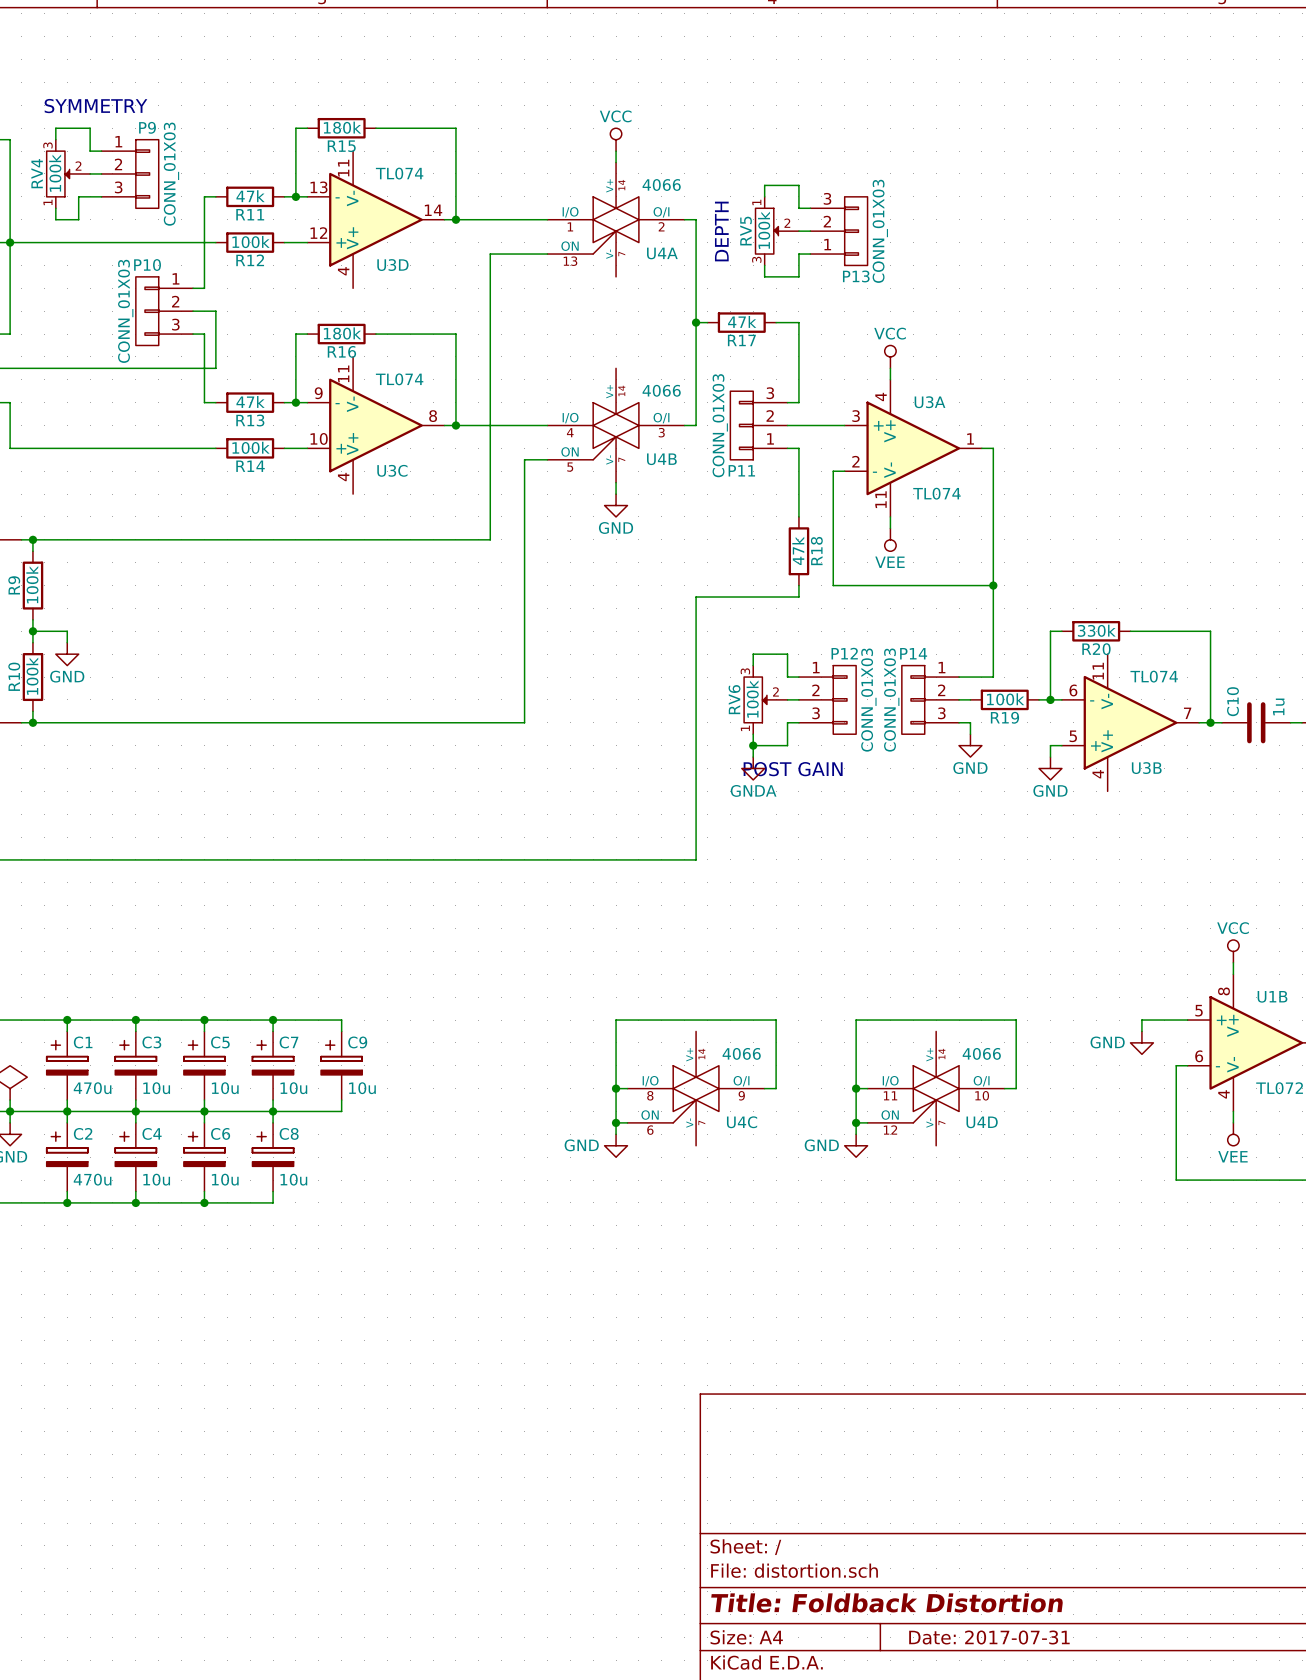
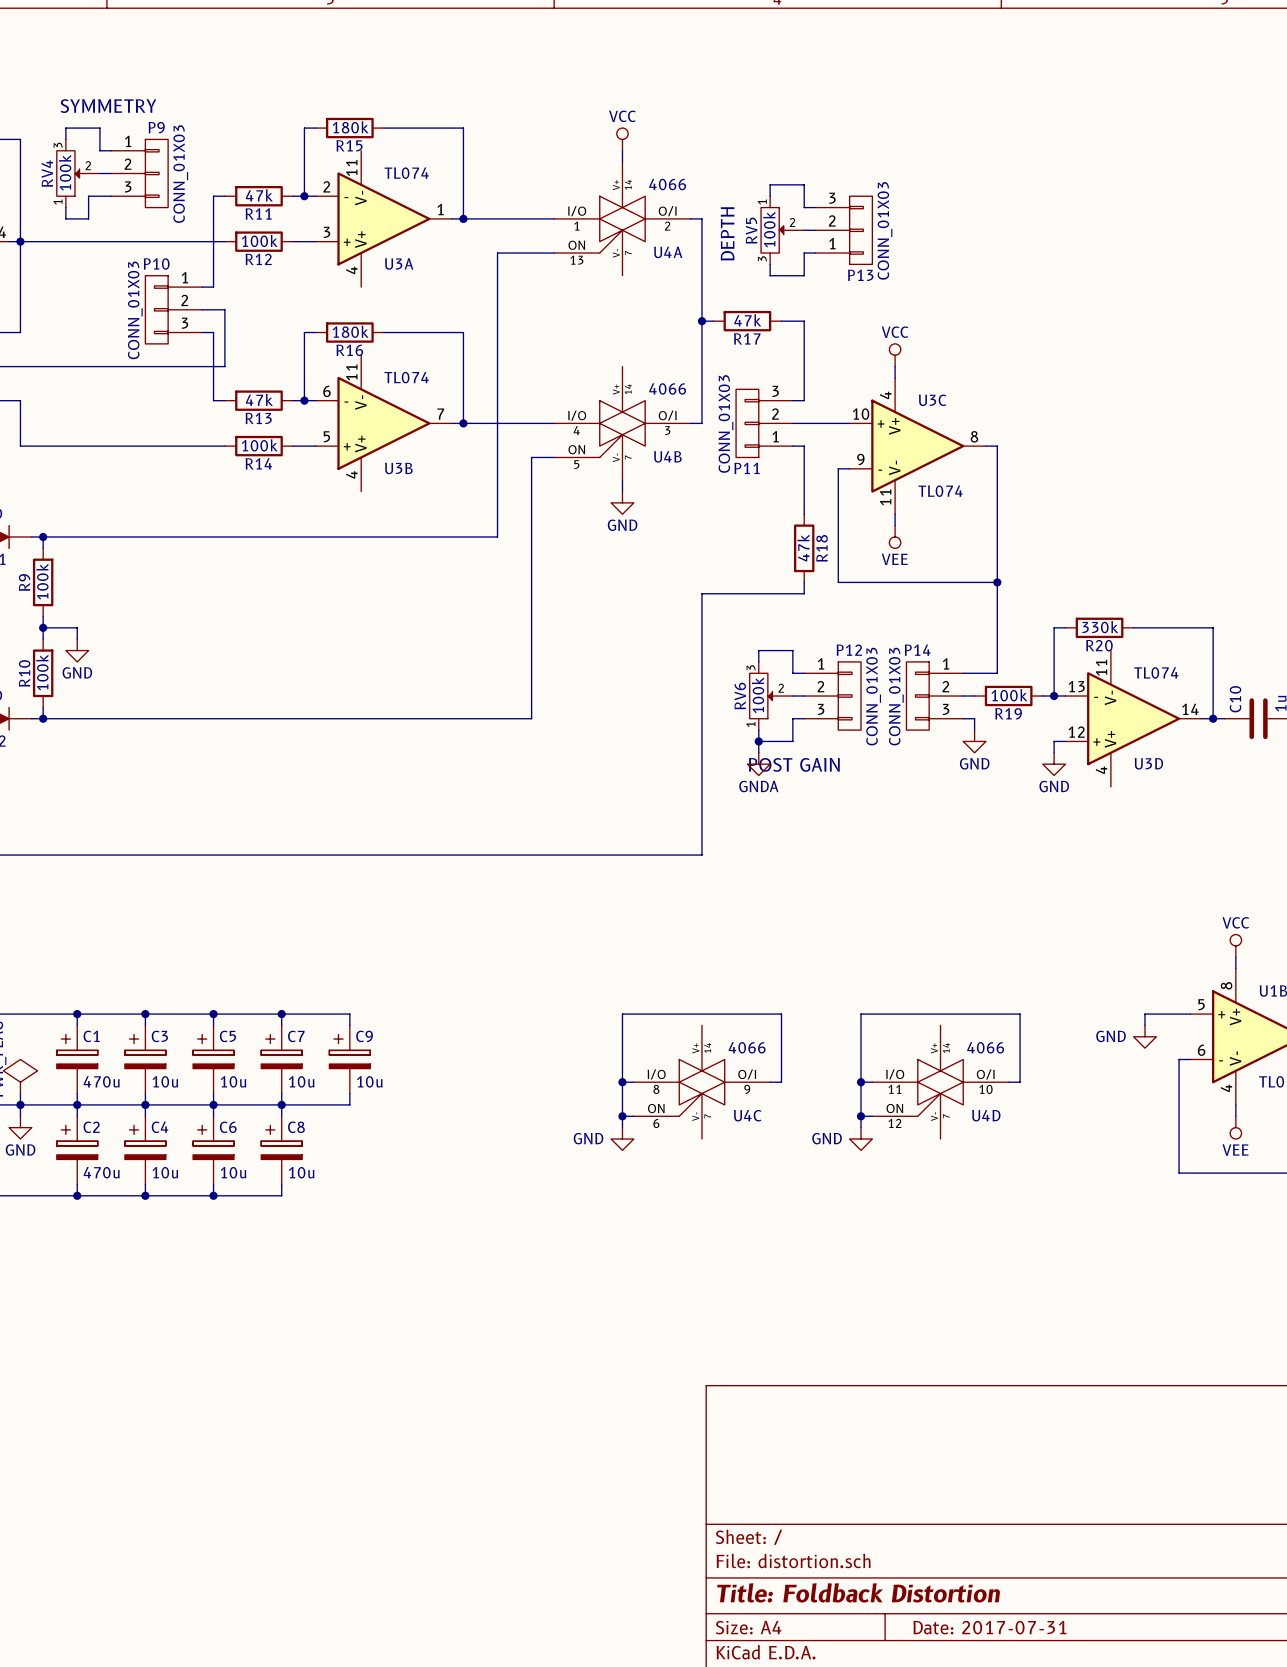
U3D position: (375, 219) -> (1133, 718)
U3C flip: as is (375, 425) -> up-down (917, 446)
U3C position: (375, 425) -> (917, 446)
U3A flip: as is (913, 448) -> up-down (383, 218)
U3A position: (913, 448) -> (383, 218)
U3B position: (1130, 722) -> (383, 423)

